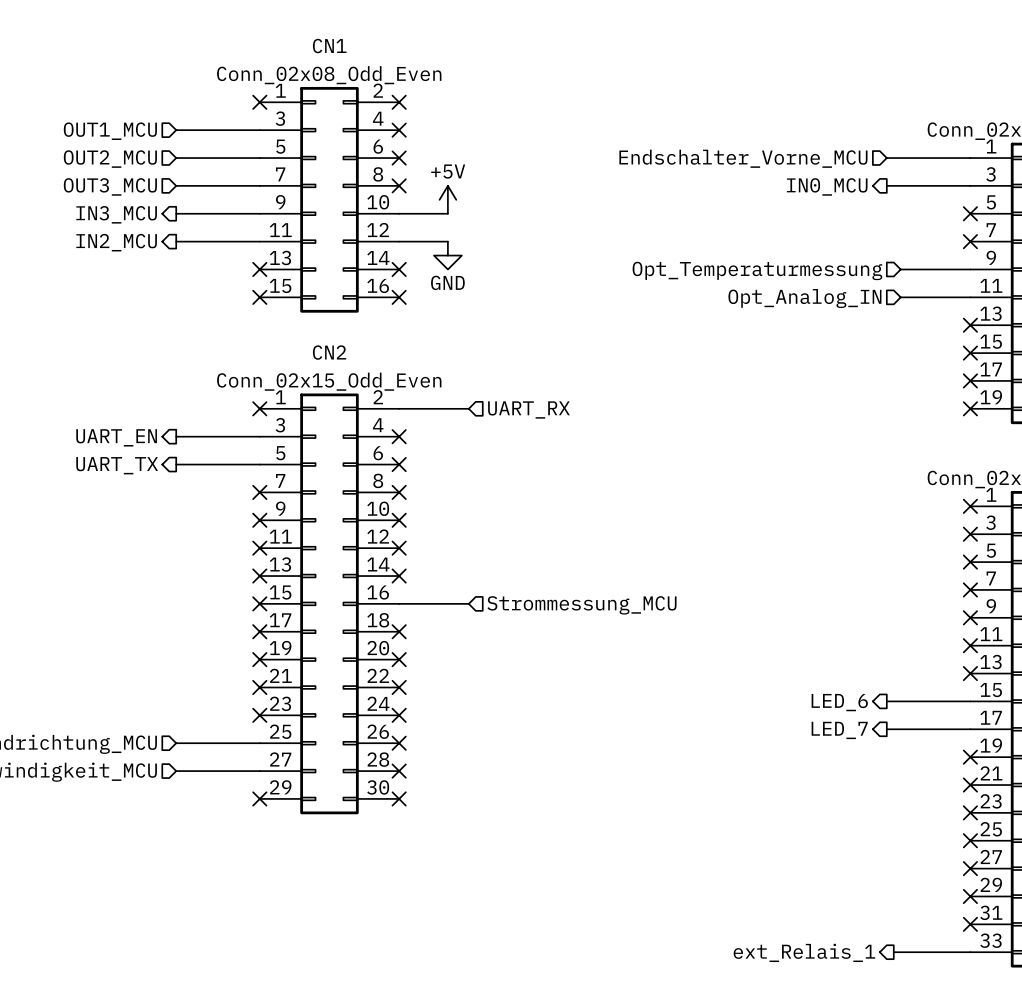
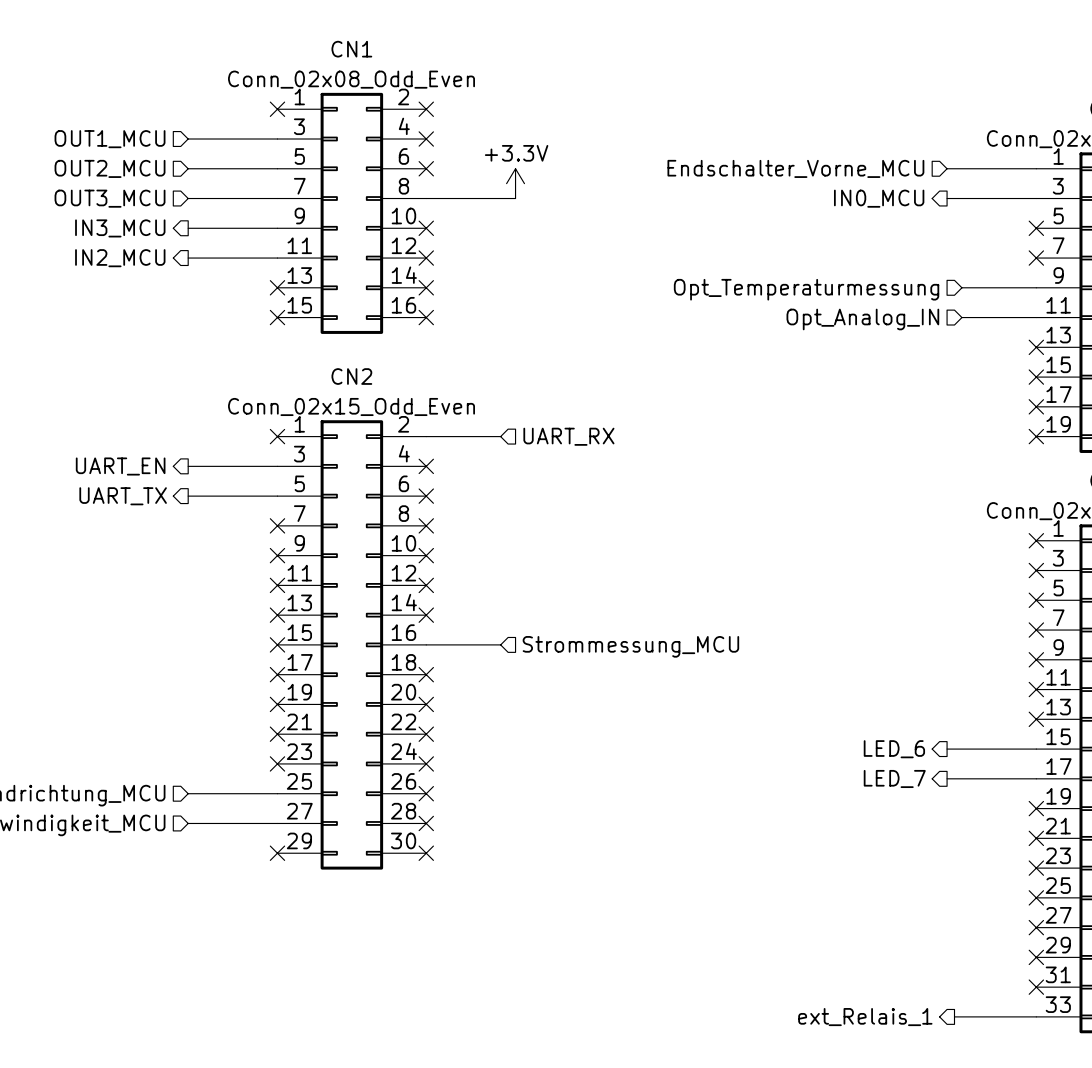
power symbol: none -> +3.3V (515, 183)
wire: none -> (426, 198) (515, 198)
no-connect mark: (399, 185) -> none
power symbol: +5V (447, 199) -> none
wire: (399, 213) (447, 213) -> none
no-connect mark: none -> (426, 228)
wire: (399, 241) (447, 241) -> none
no-connect mark: none -> (426, 258)
power symbol: GND (447, 255) -> none

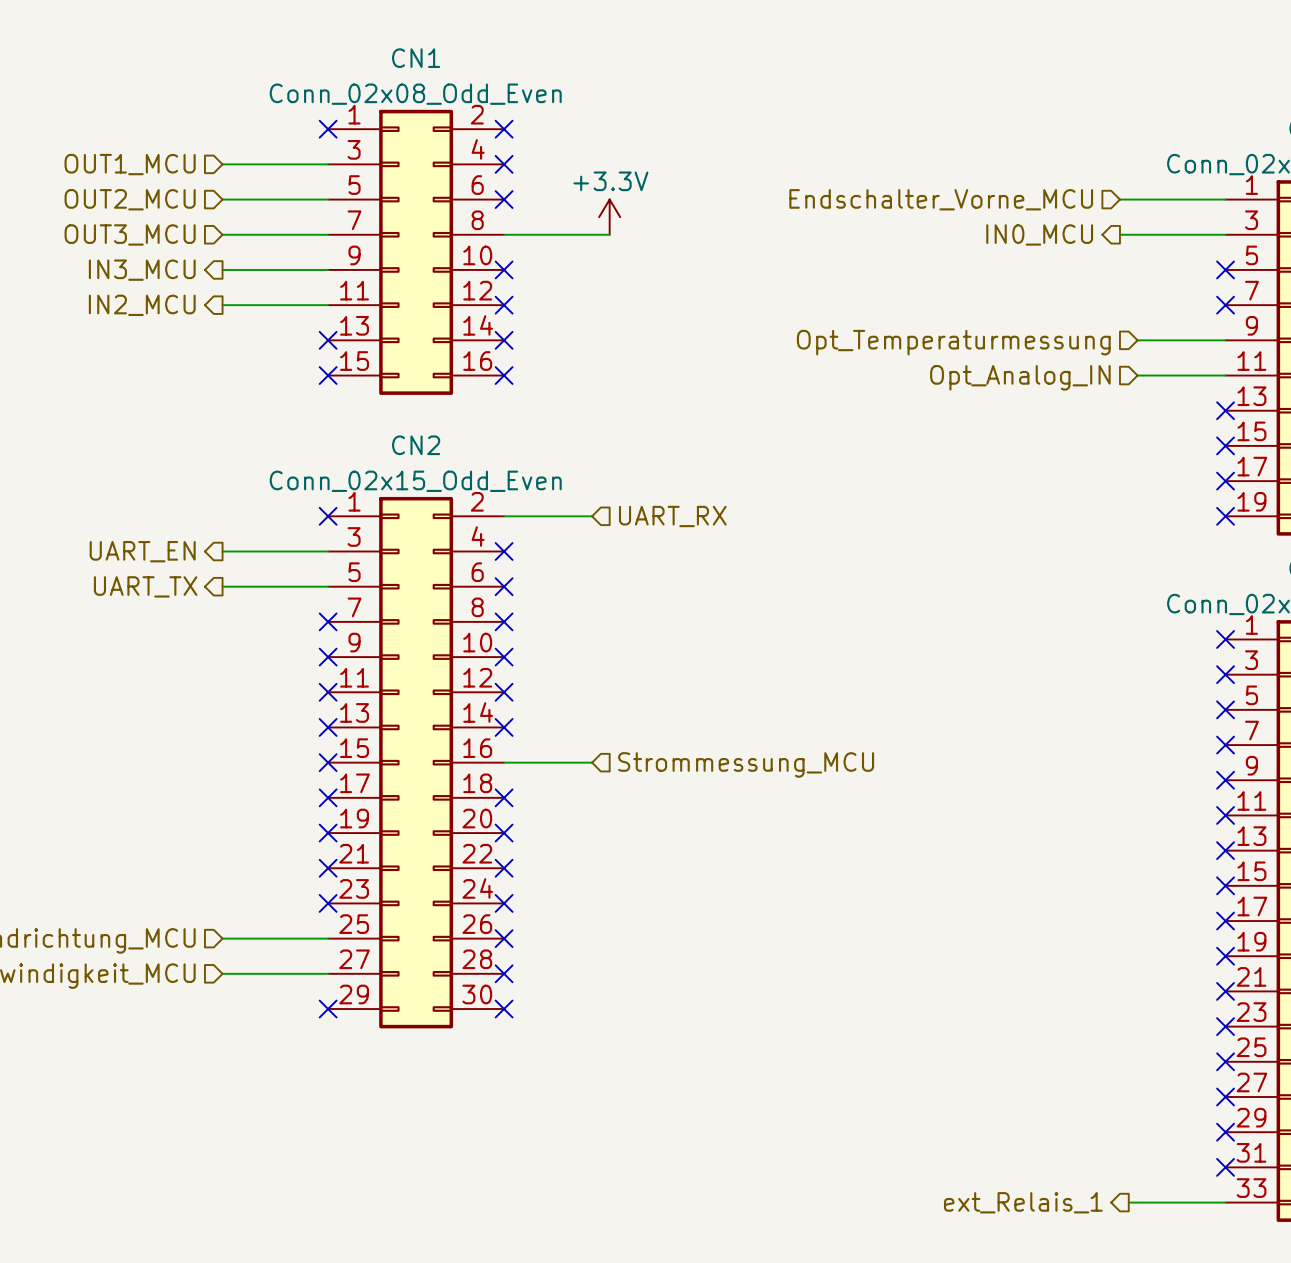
hierarchical label: LED_6 (894, 749) -> none
wire: (947, 749) (1036, 749) -> none
no-connect mark: none -> (1225, 885)
hierarchical label: LED_7 (894, 778) -> none
wire: (947, 778) (1036, 778) -> none
no-connect mark: none -> (1225, 921)

